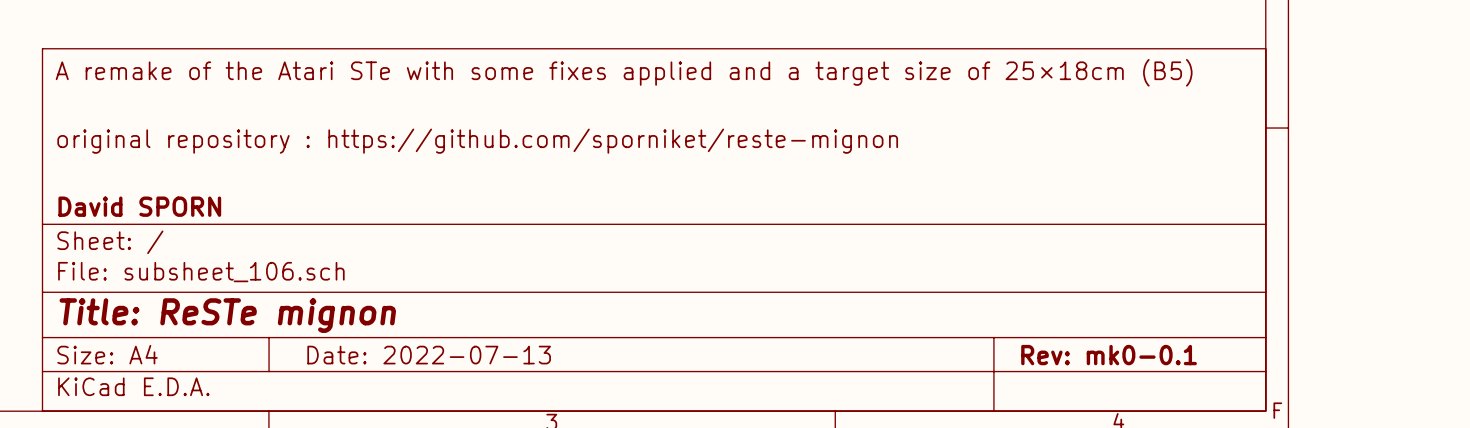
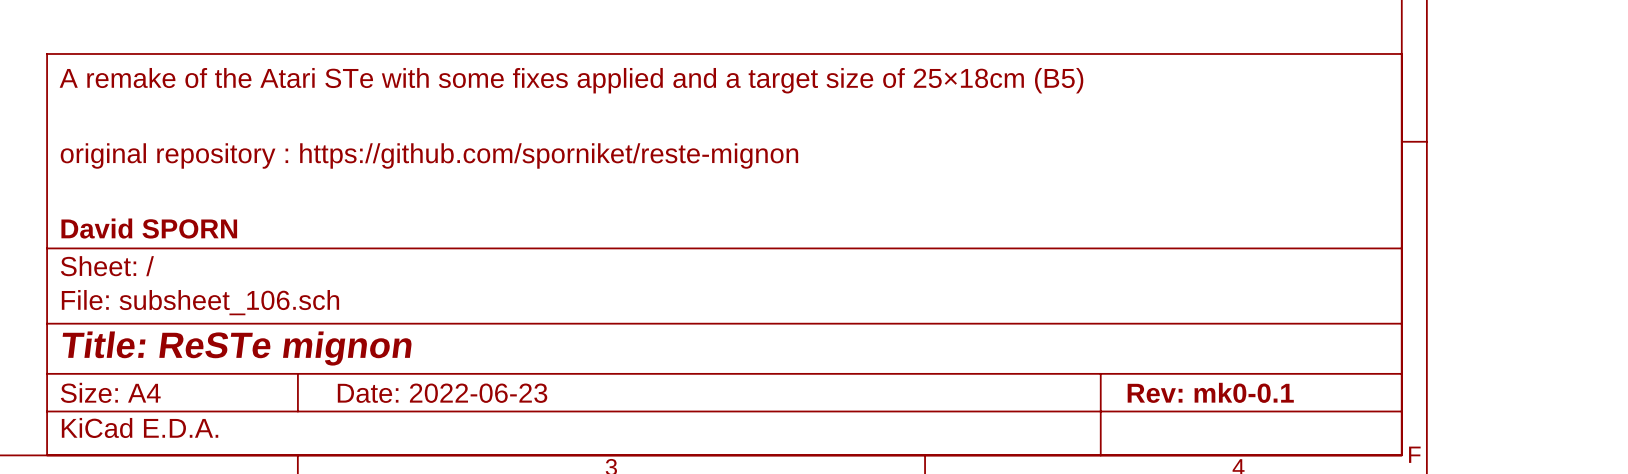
title block: Date: 2022-07-13 (429, 355) -> Date: 2022-06-23 (442, 393)

